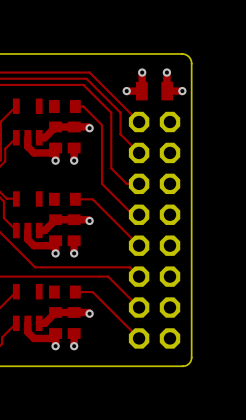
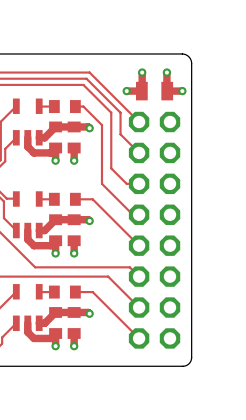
top track: none -> (39, 106) (54, 106)
top track: none -> (39, 199) (54, 199)
top track: none -> (39, 291) (54, 292)

